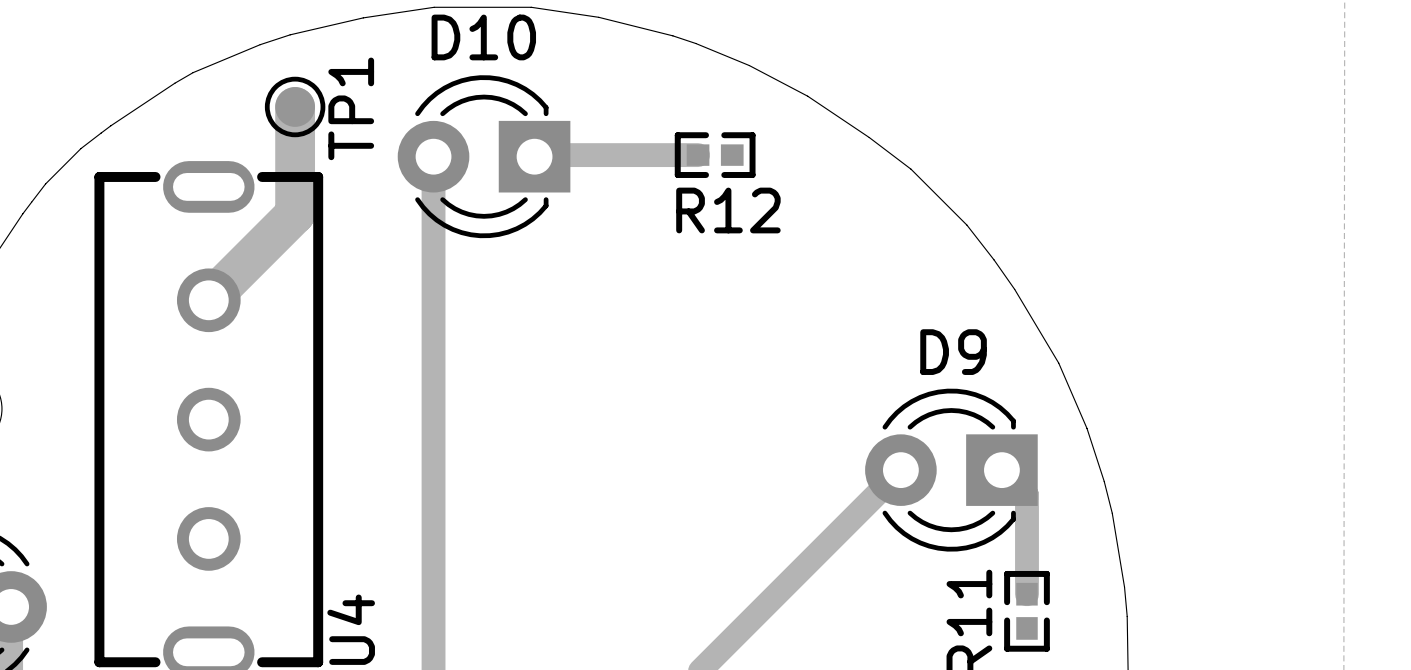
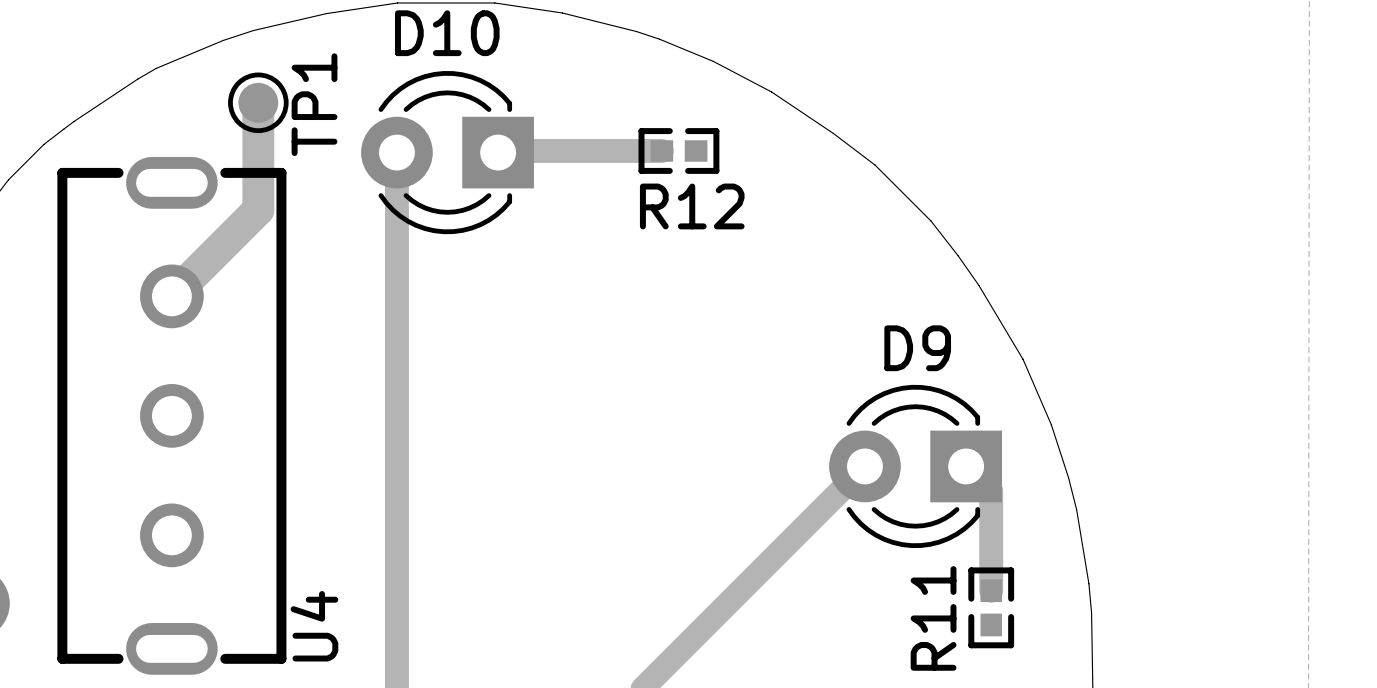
track width: thick (295, 106) (295, 213) (208, 300) -> thin (258, 102) (258, 209) (171, 296)

